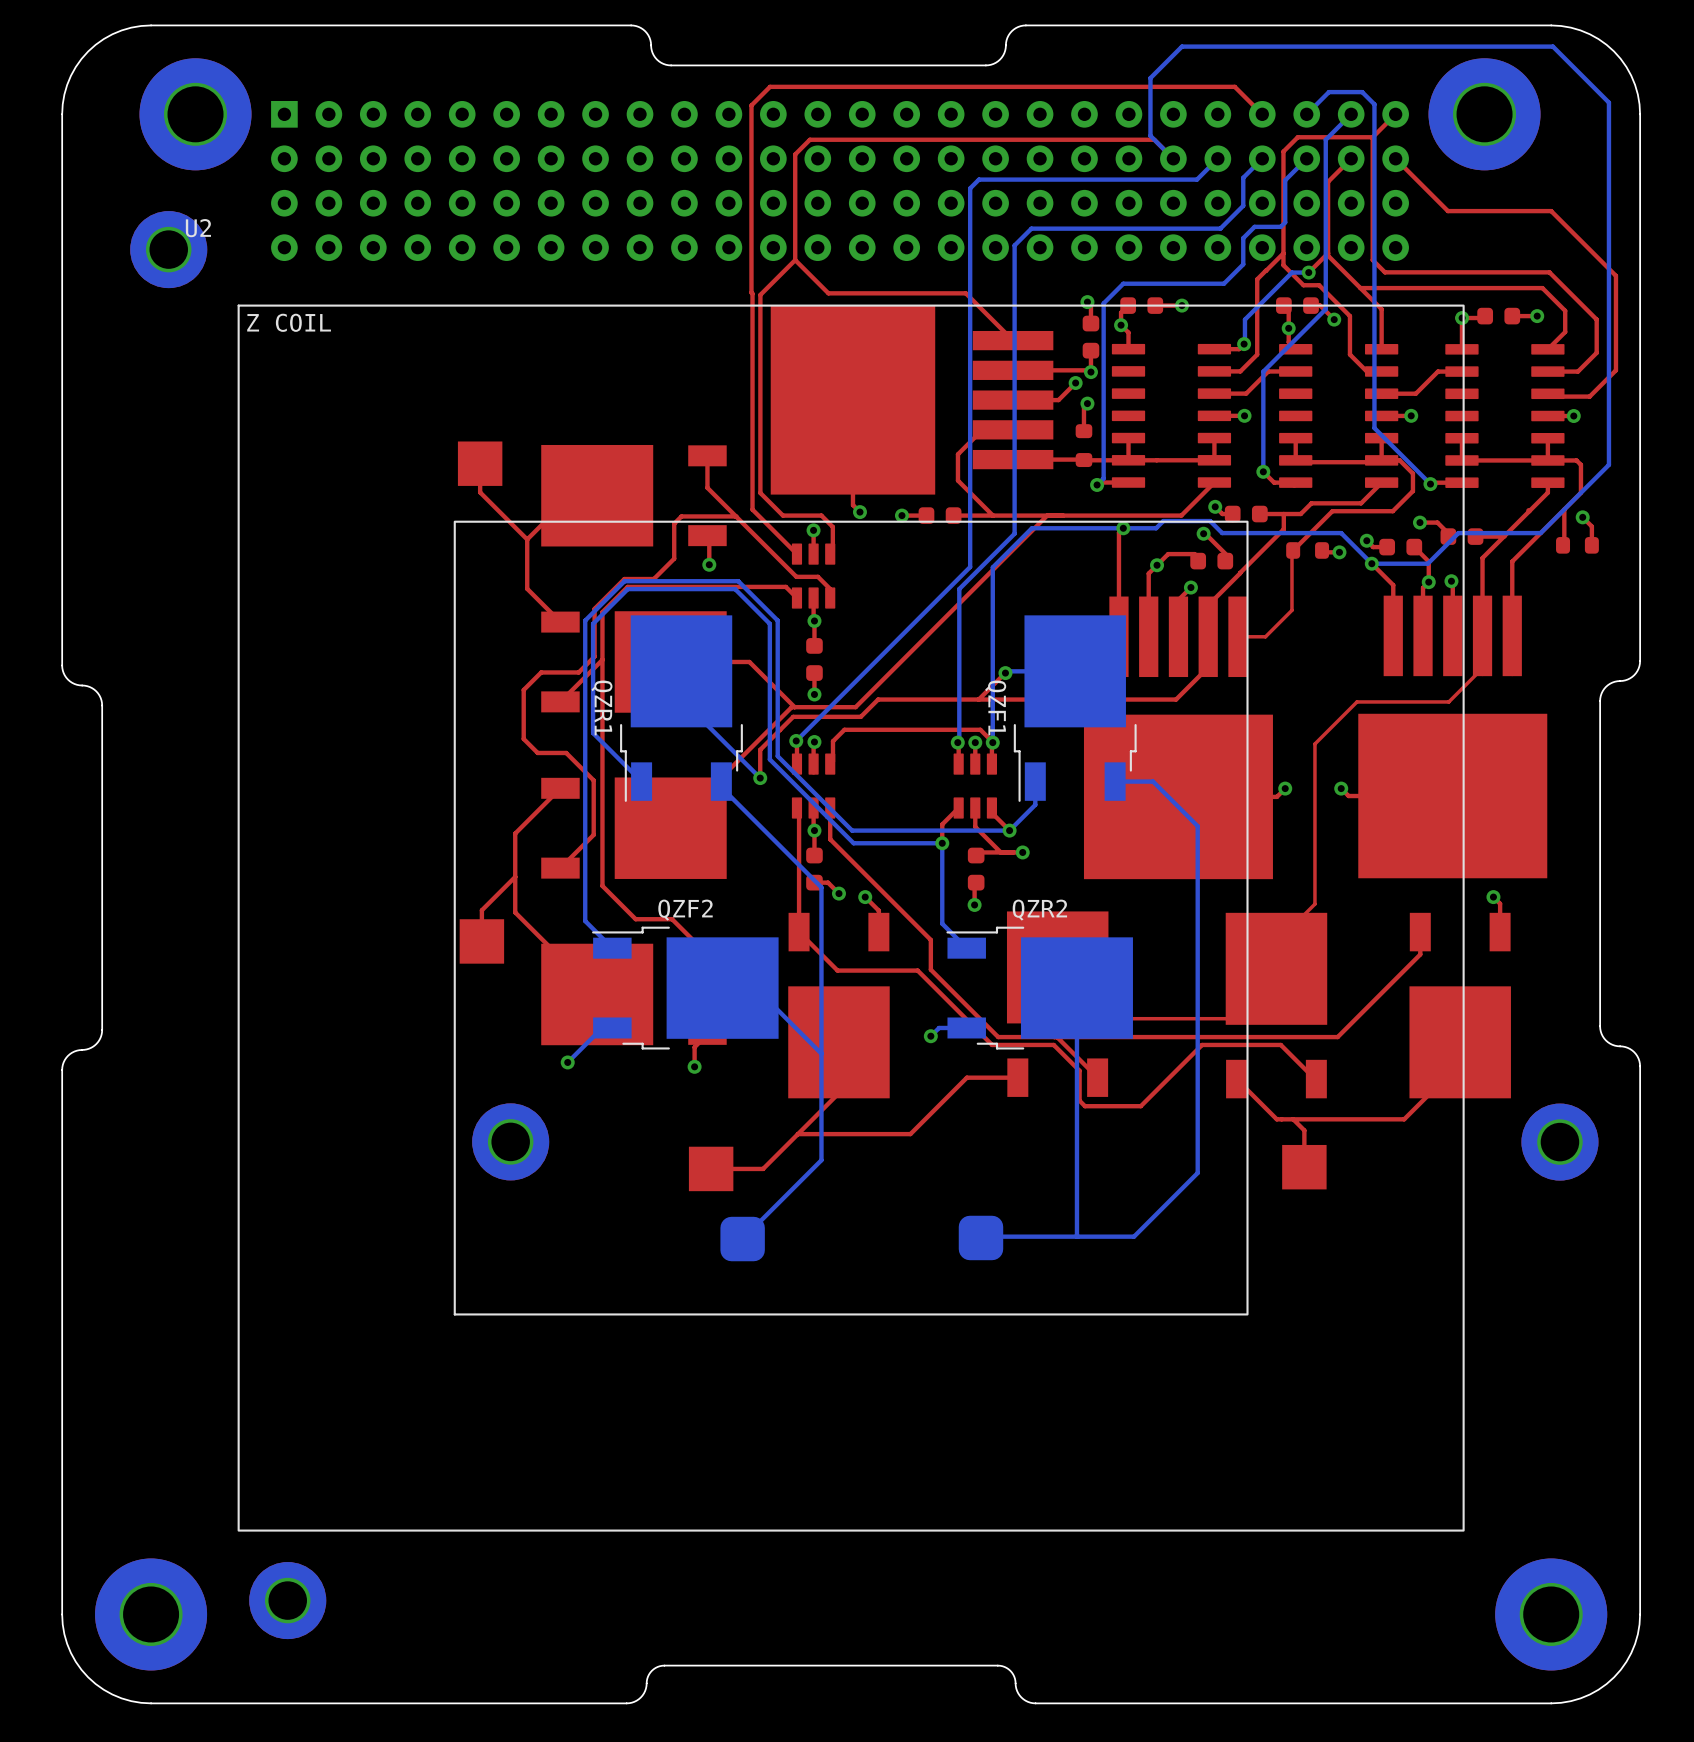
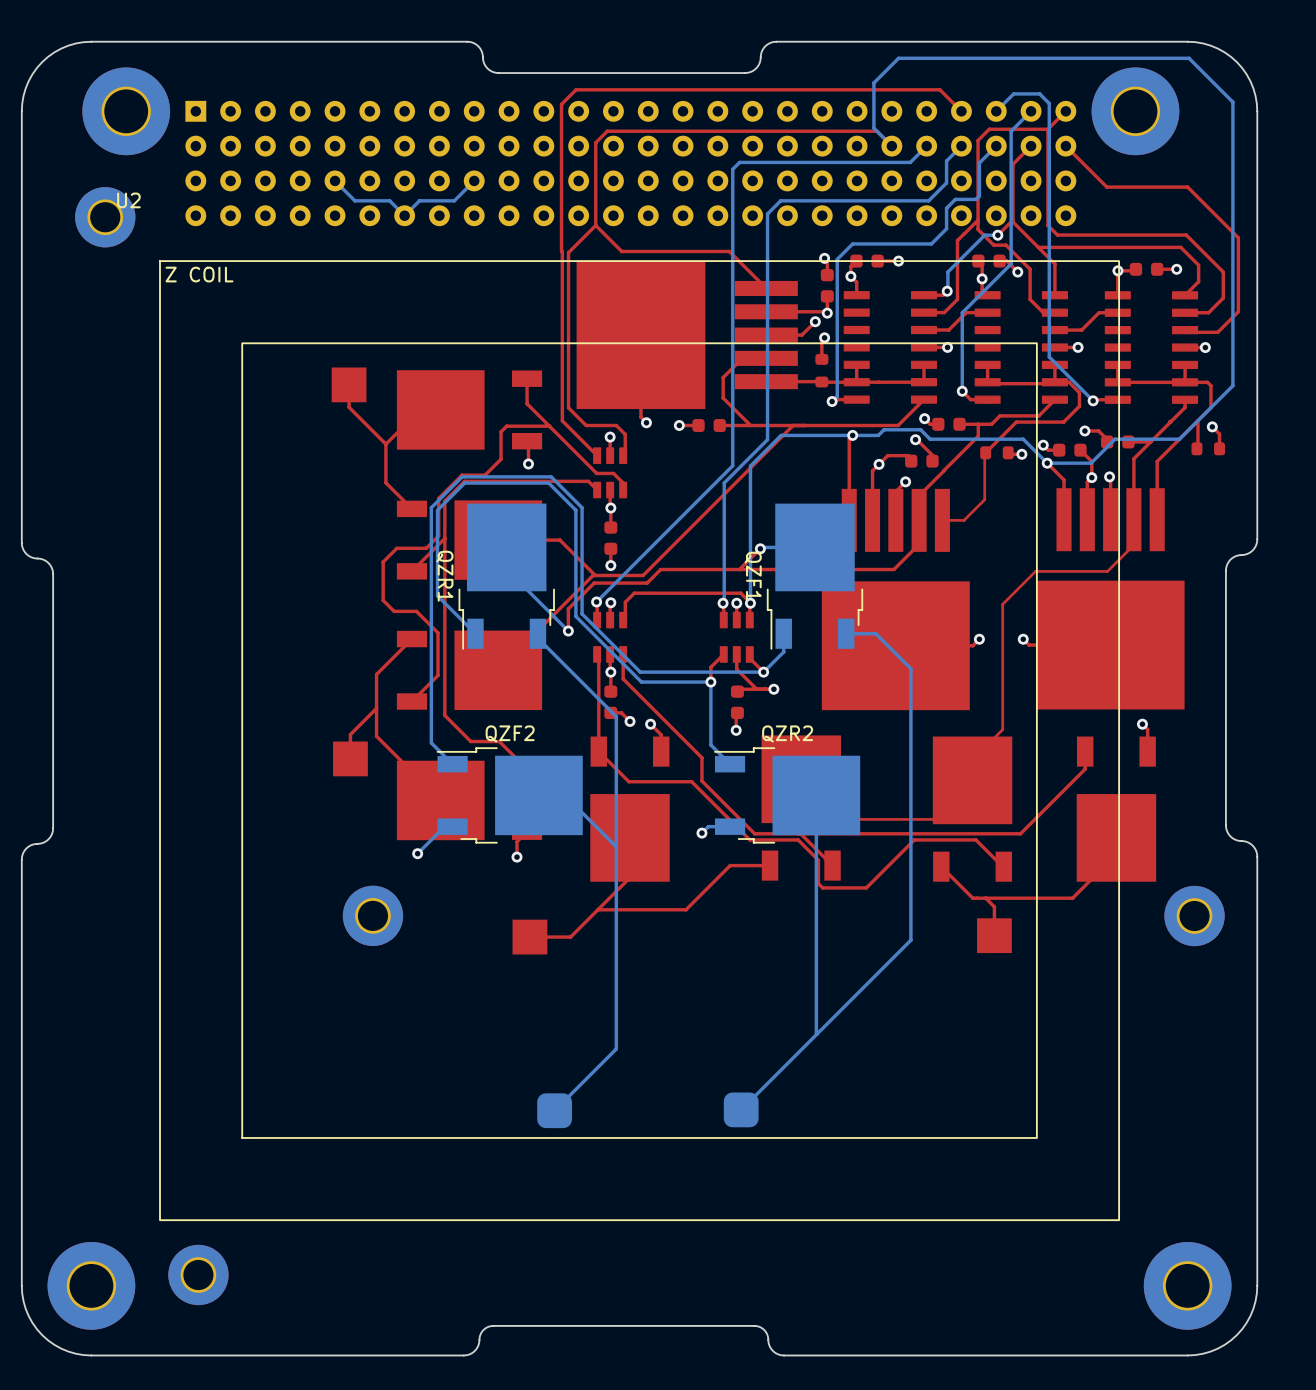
bottom track: none -> (474, 180) (454, 200) (419, 200) (404, 215) (389, 200) (354, 200) (335, 180)
U2 footprint: [237, 304, 1465, 1532] -> [159, 260, 1120, 1222]
bottom track: (821, 1160) (742, 1239) -> (616, 930) (616, 1048) (554, 1110)
bottom track: none -> (816, 990) (817, 1033)
bottom track: (1134, 1236) (980, 1237) -> (861, 990) (741, 1109)

